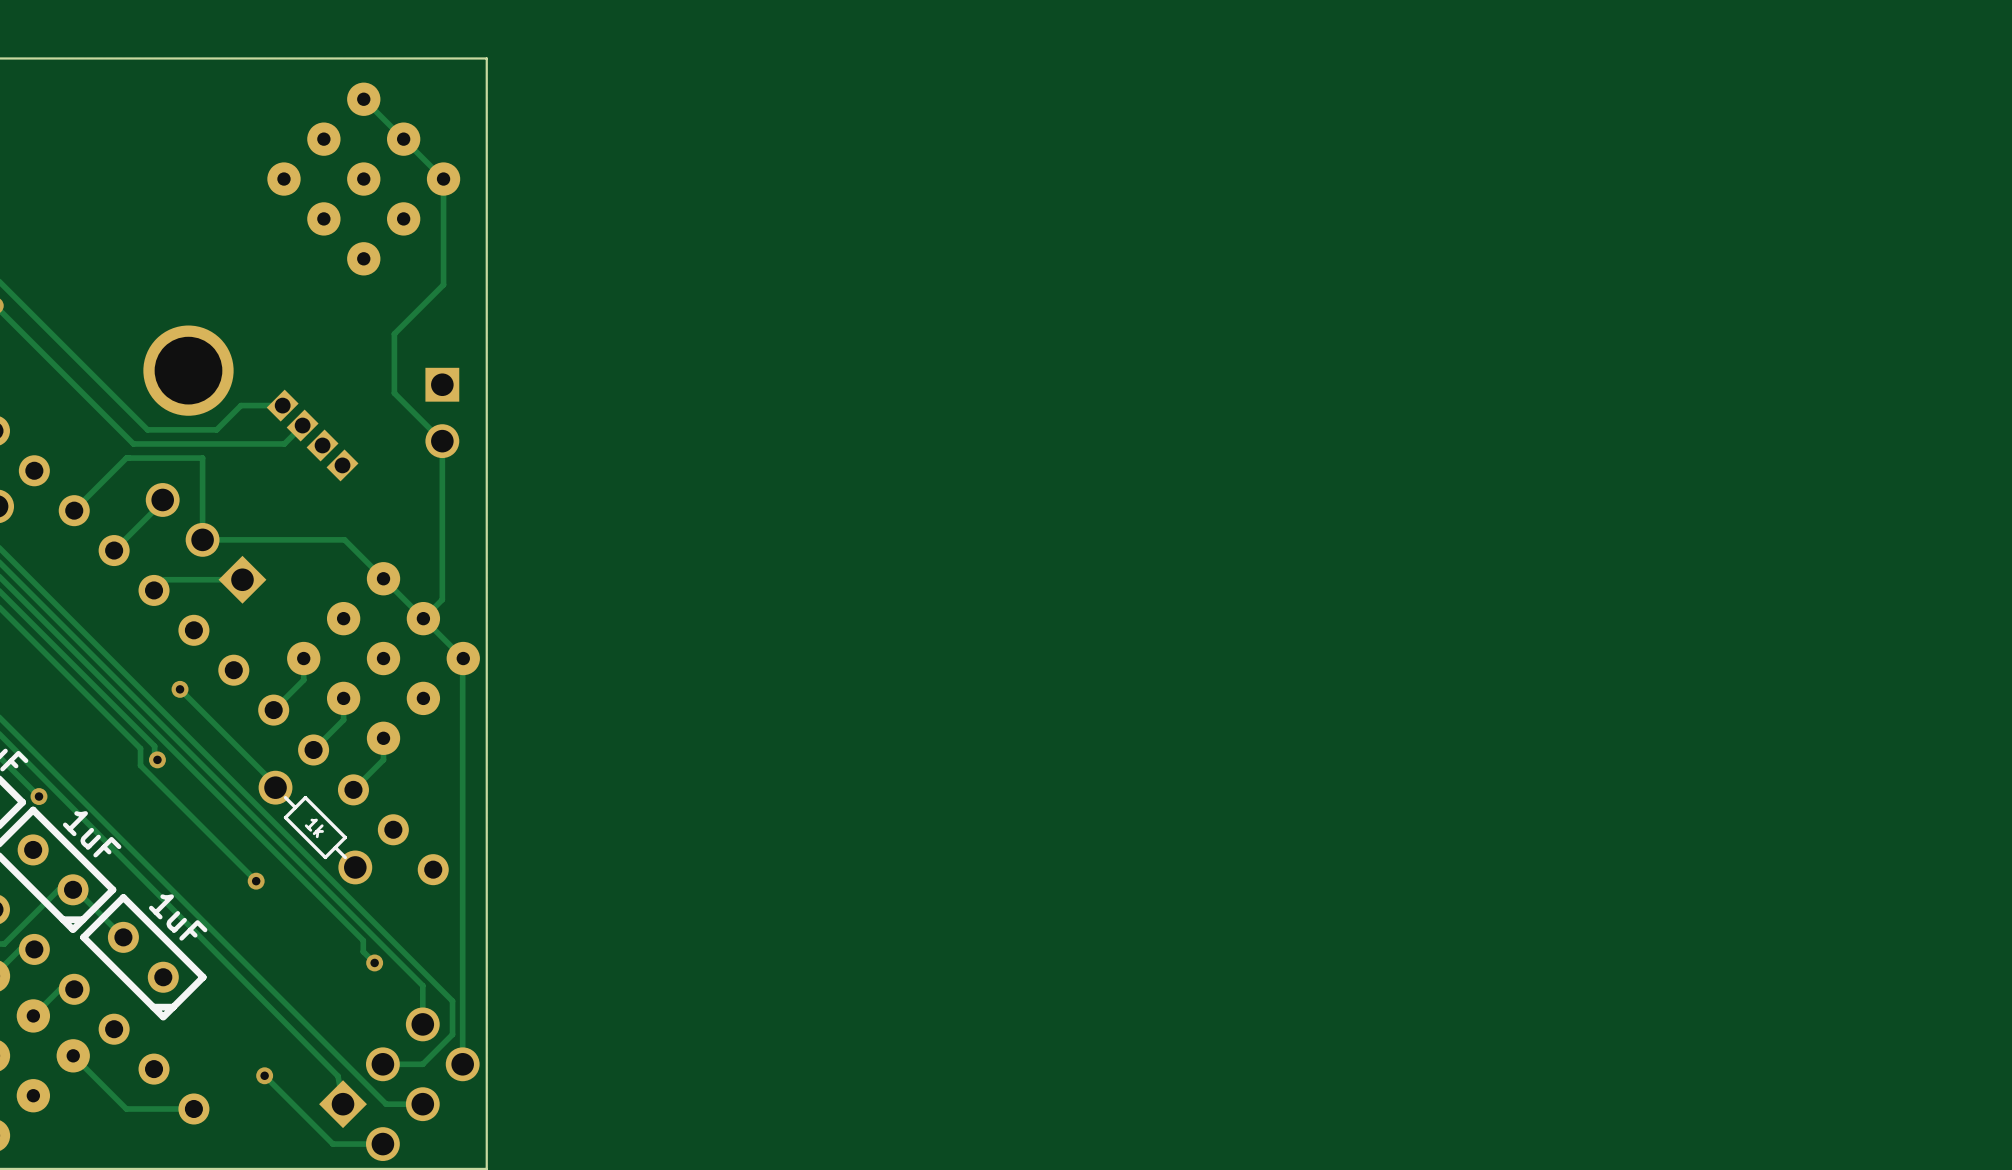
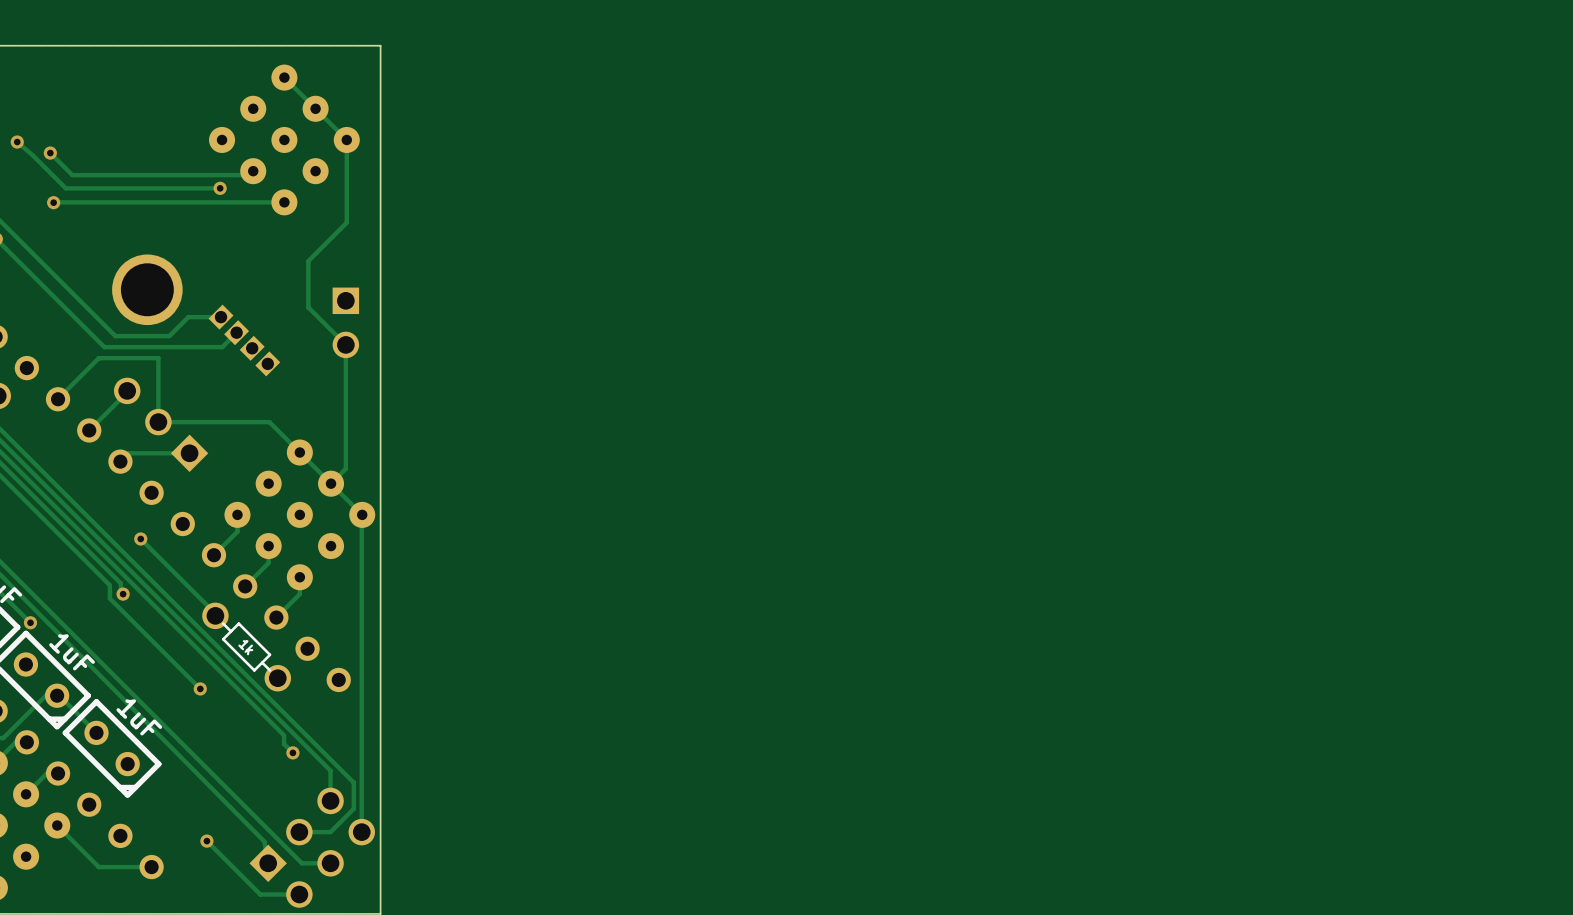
track: none -> (17, 142) (65, 188) (220, 188)
via: none -> (17, 142)
track: none -> (50, 153) (72, 175) (249, 175) (253, 171)
via: none -> (50, 153)
via: none -> (220, 188)
track: none -> (284, 202) (53, 202)
via: none -> (53, 202)

